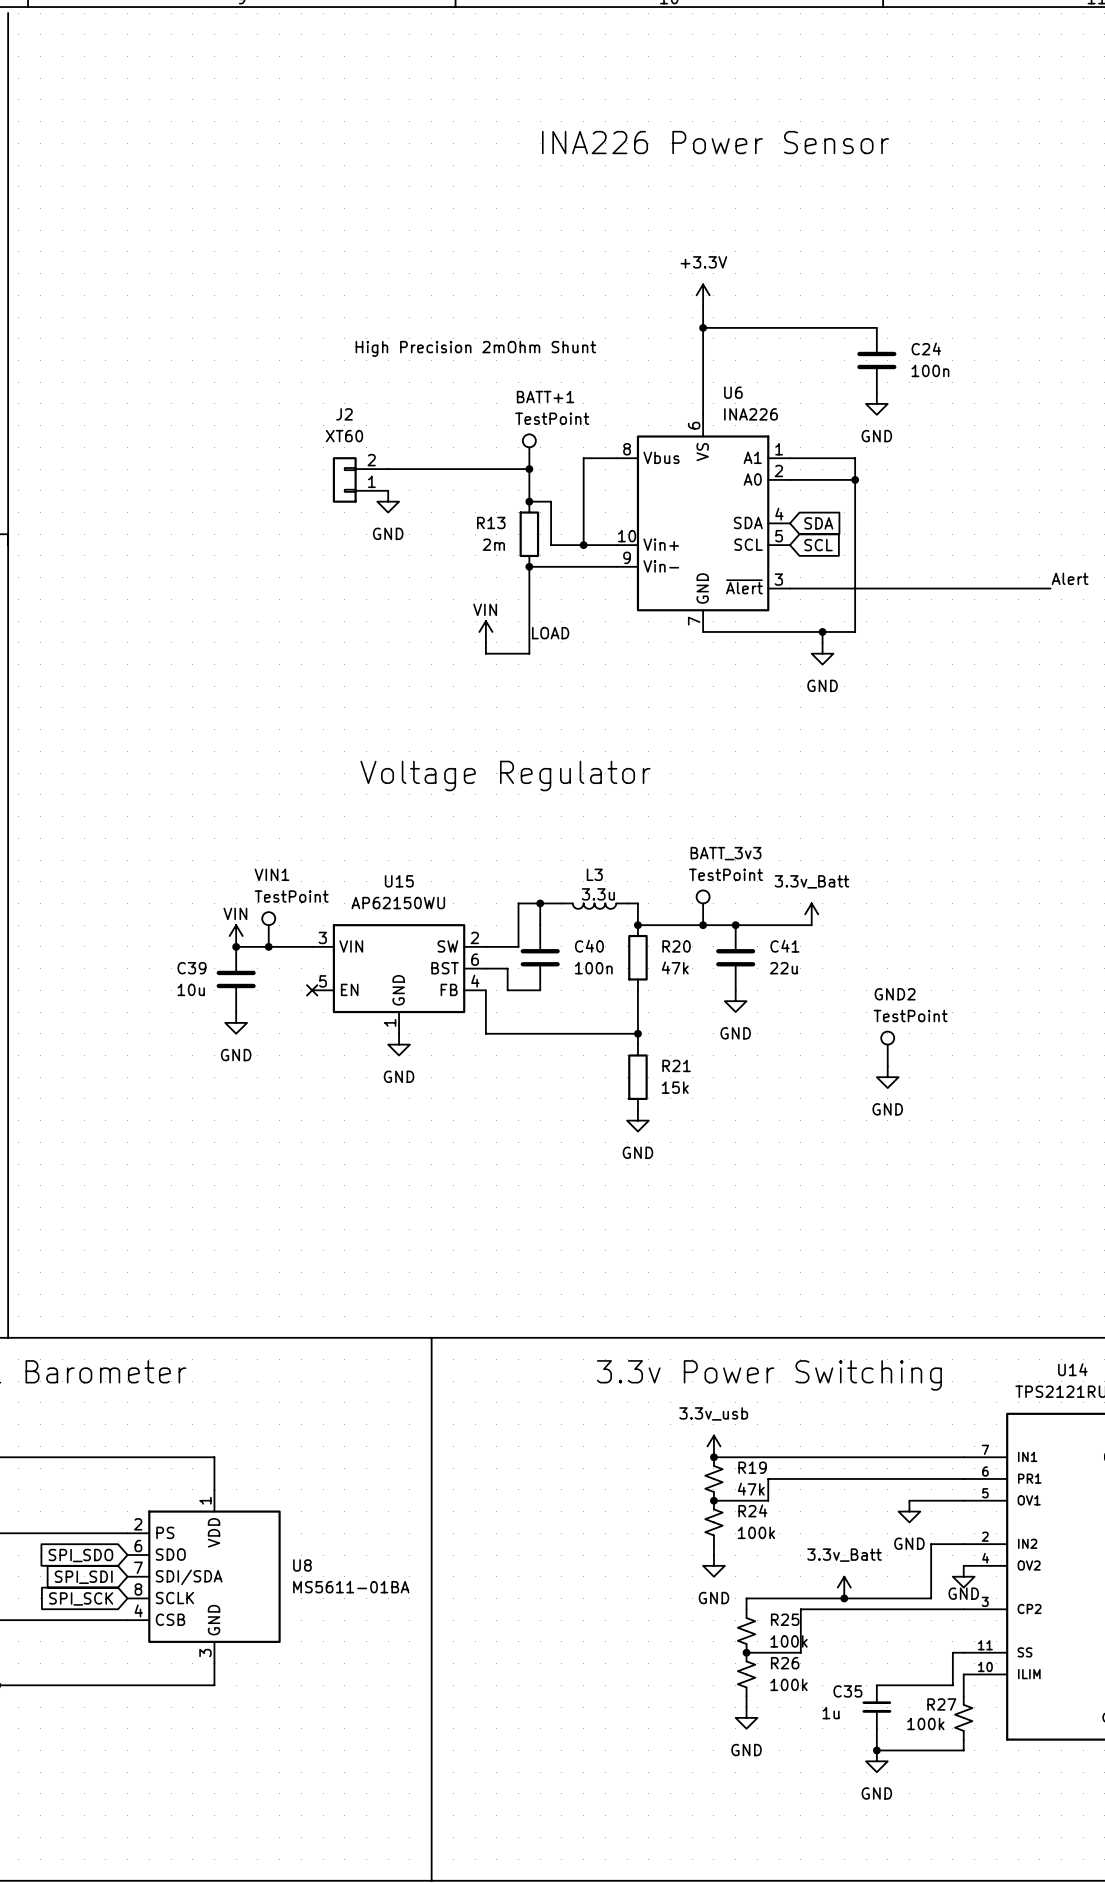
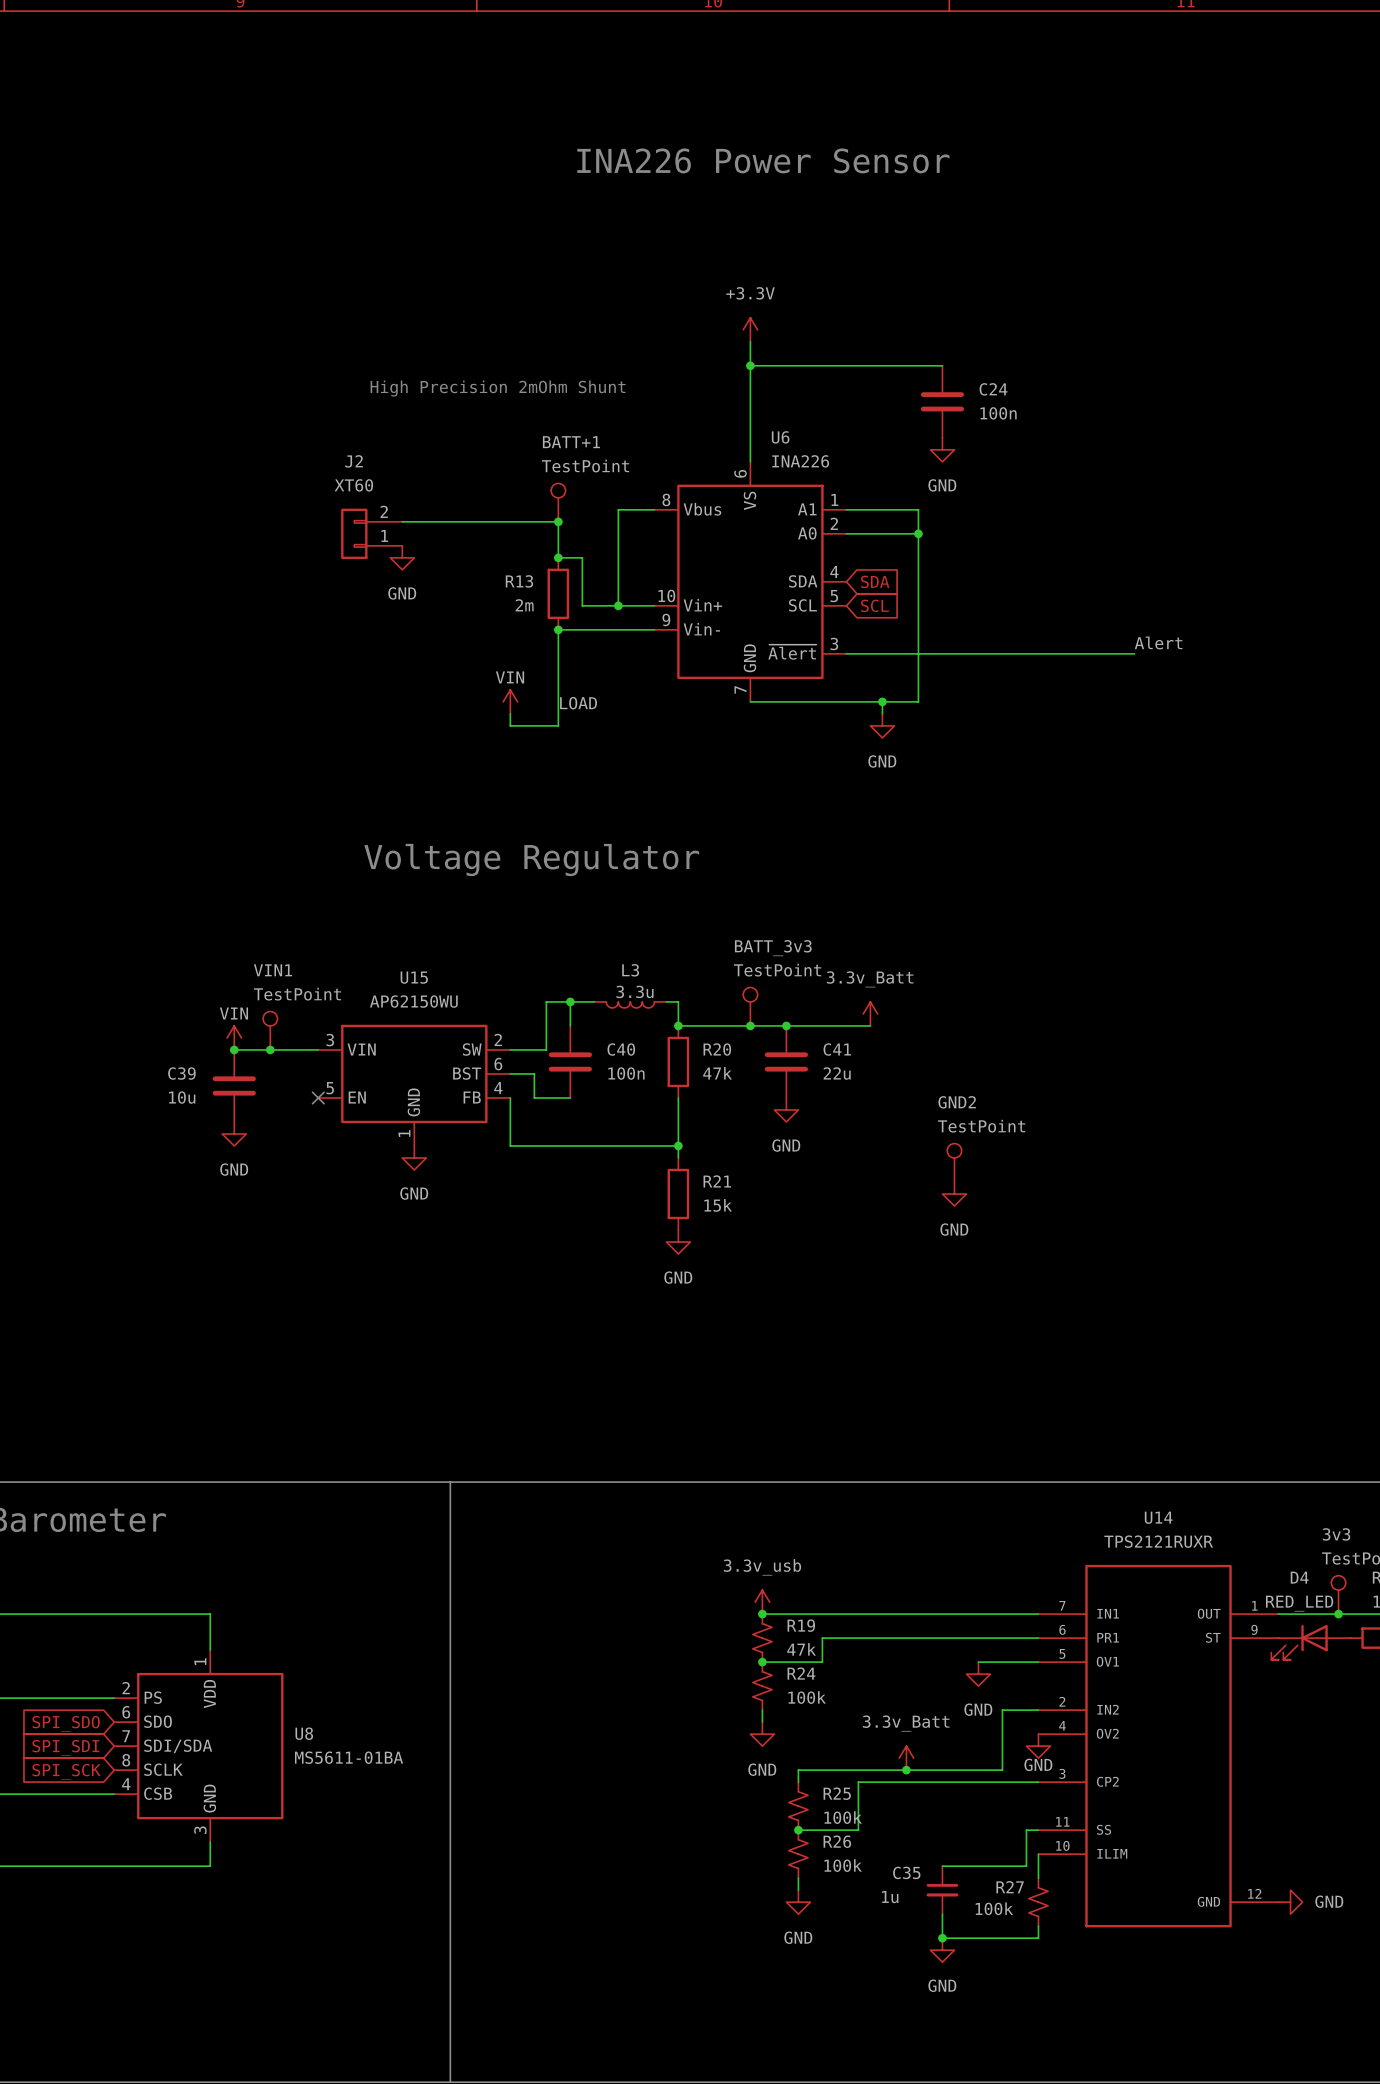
text: 3.3v Power Switching (769, 1375) -> none

